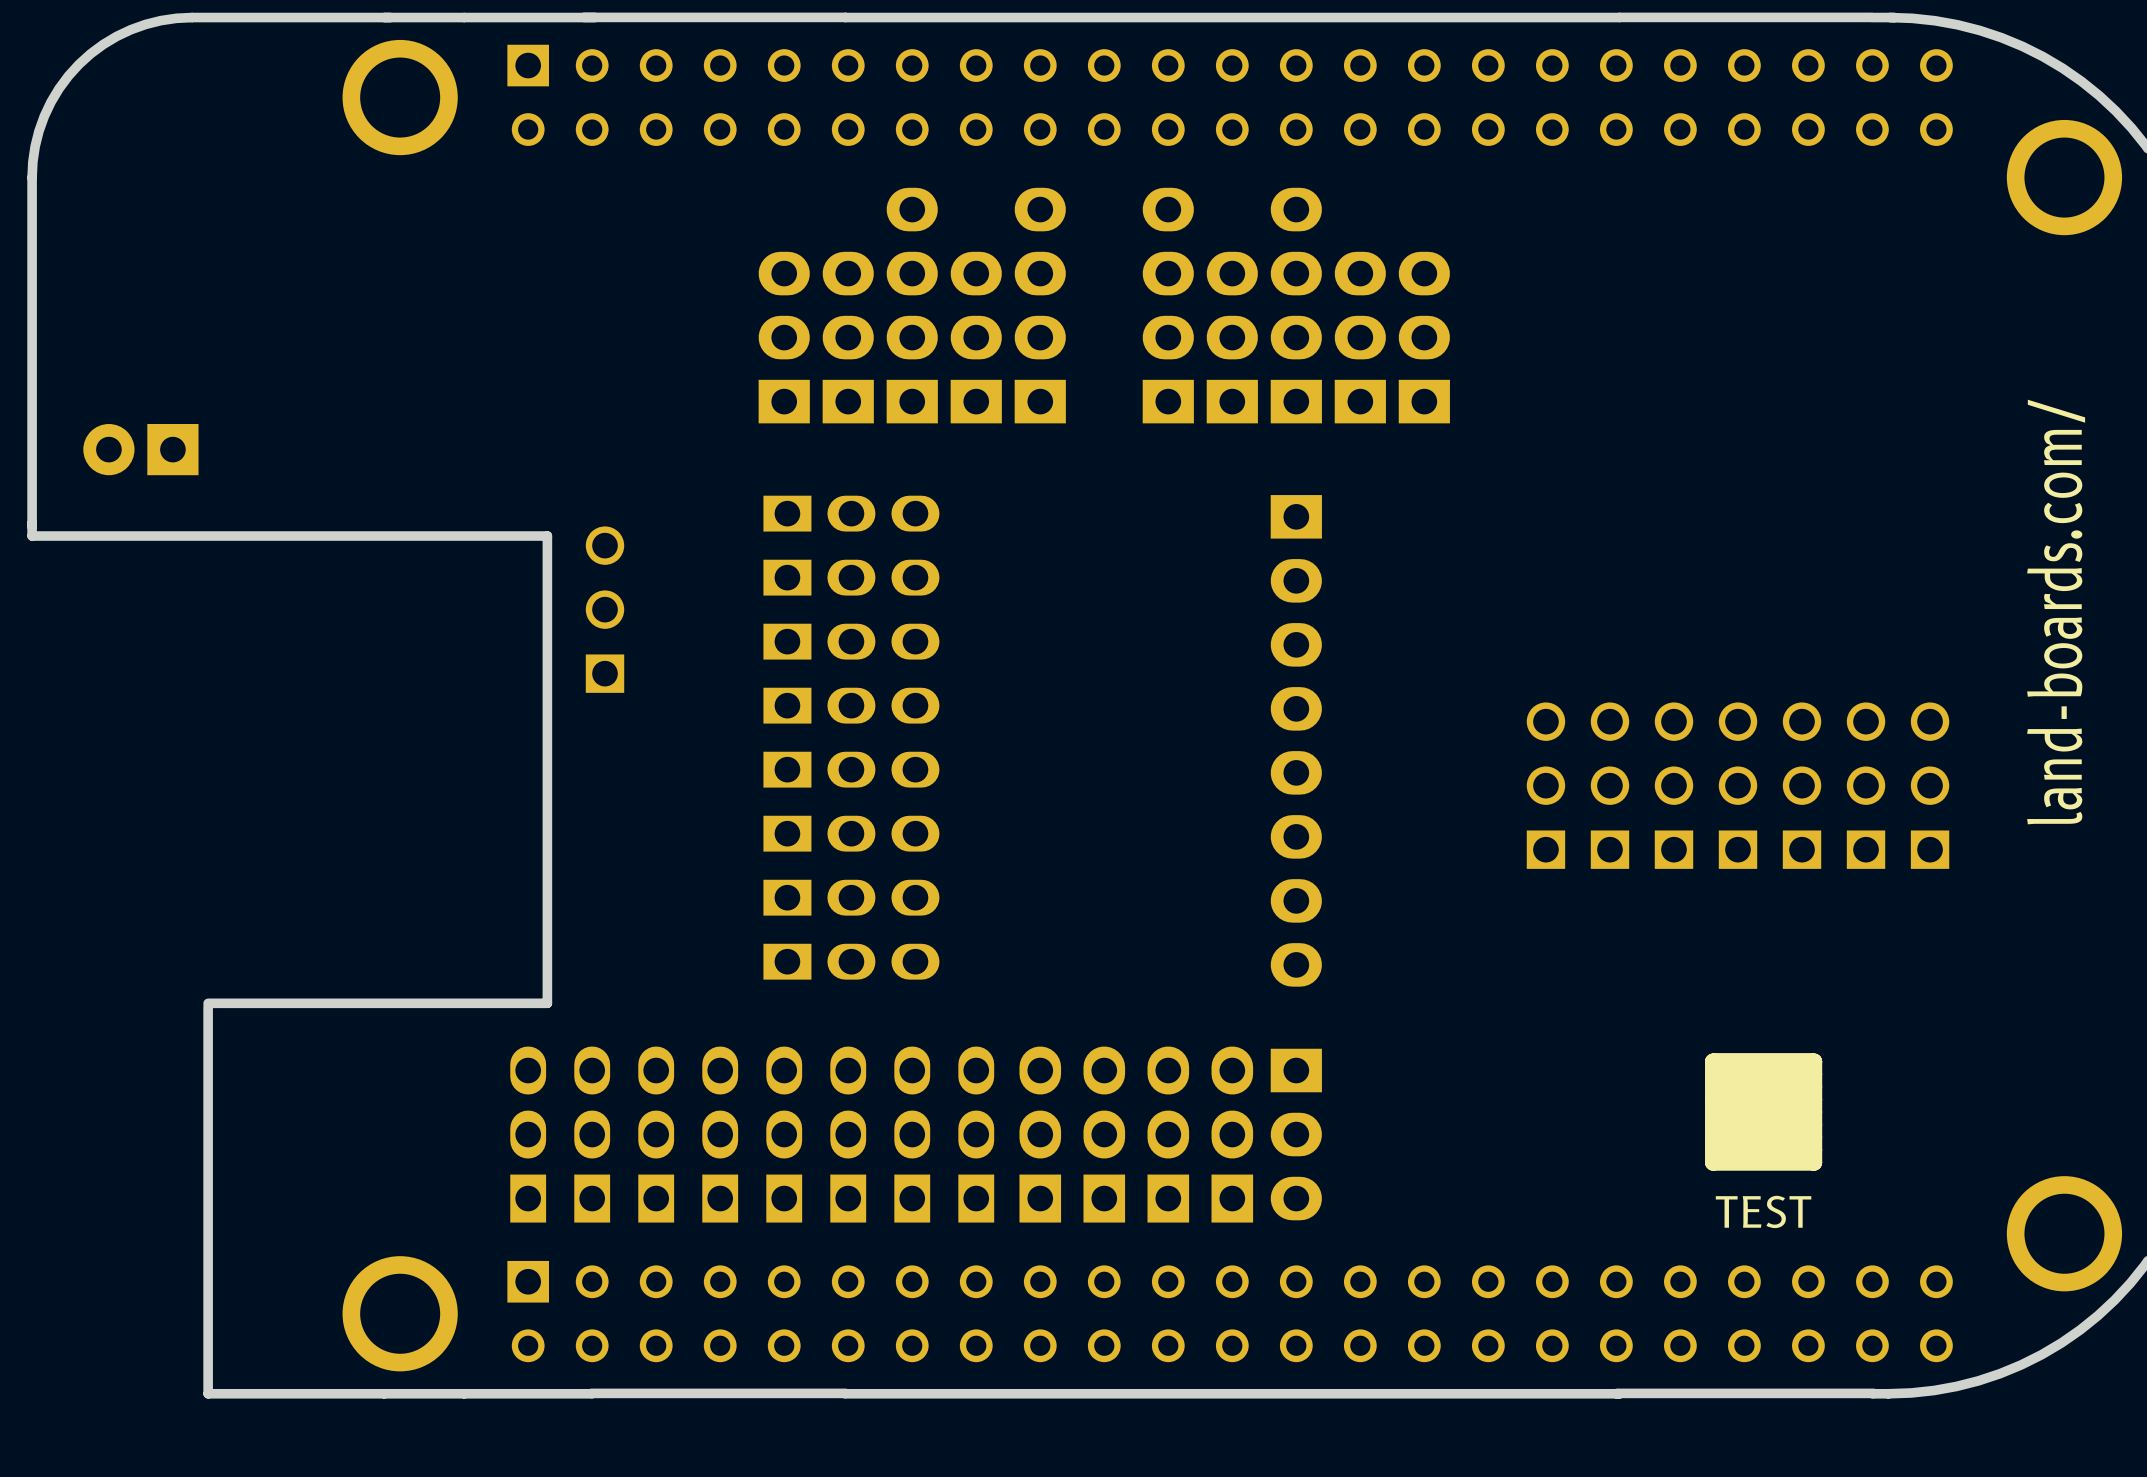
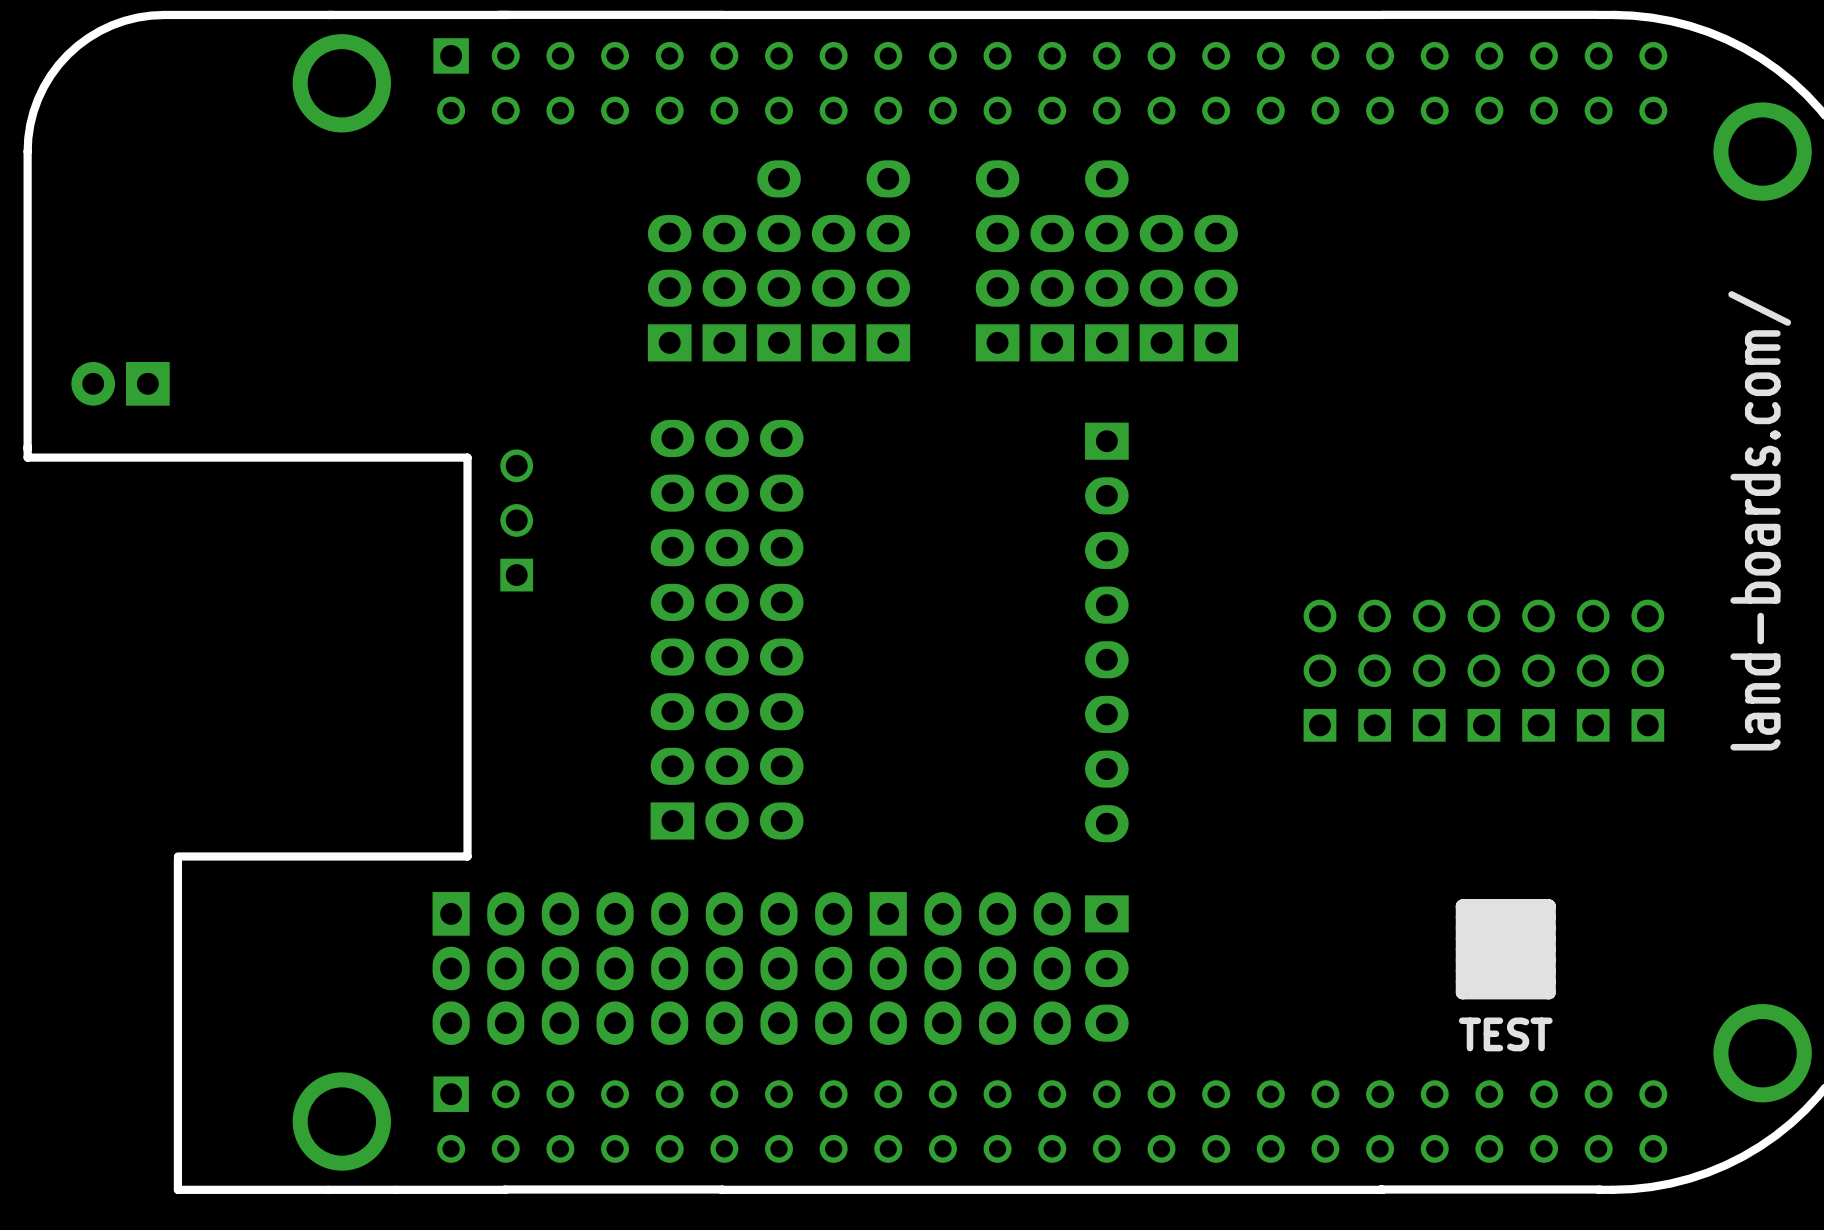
part footprint: [763, 495, 940, 980] -> [650, 419, 804, 840]
part footprint: [510, 1046, 995, 1223] -> [432, 892, 853, 1046]
part footprint: [1019, 1046, 1254, 1223] -> [869, 892, 1071, 1046]

